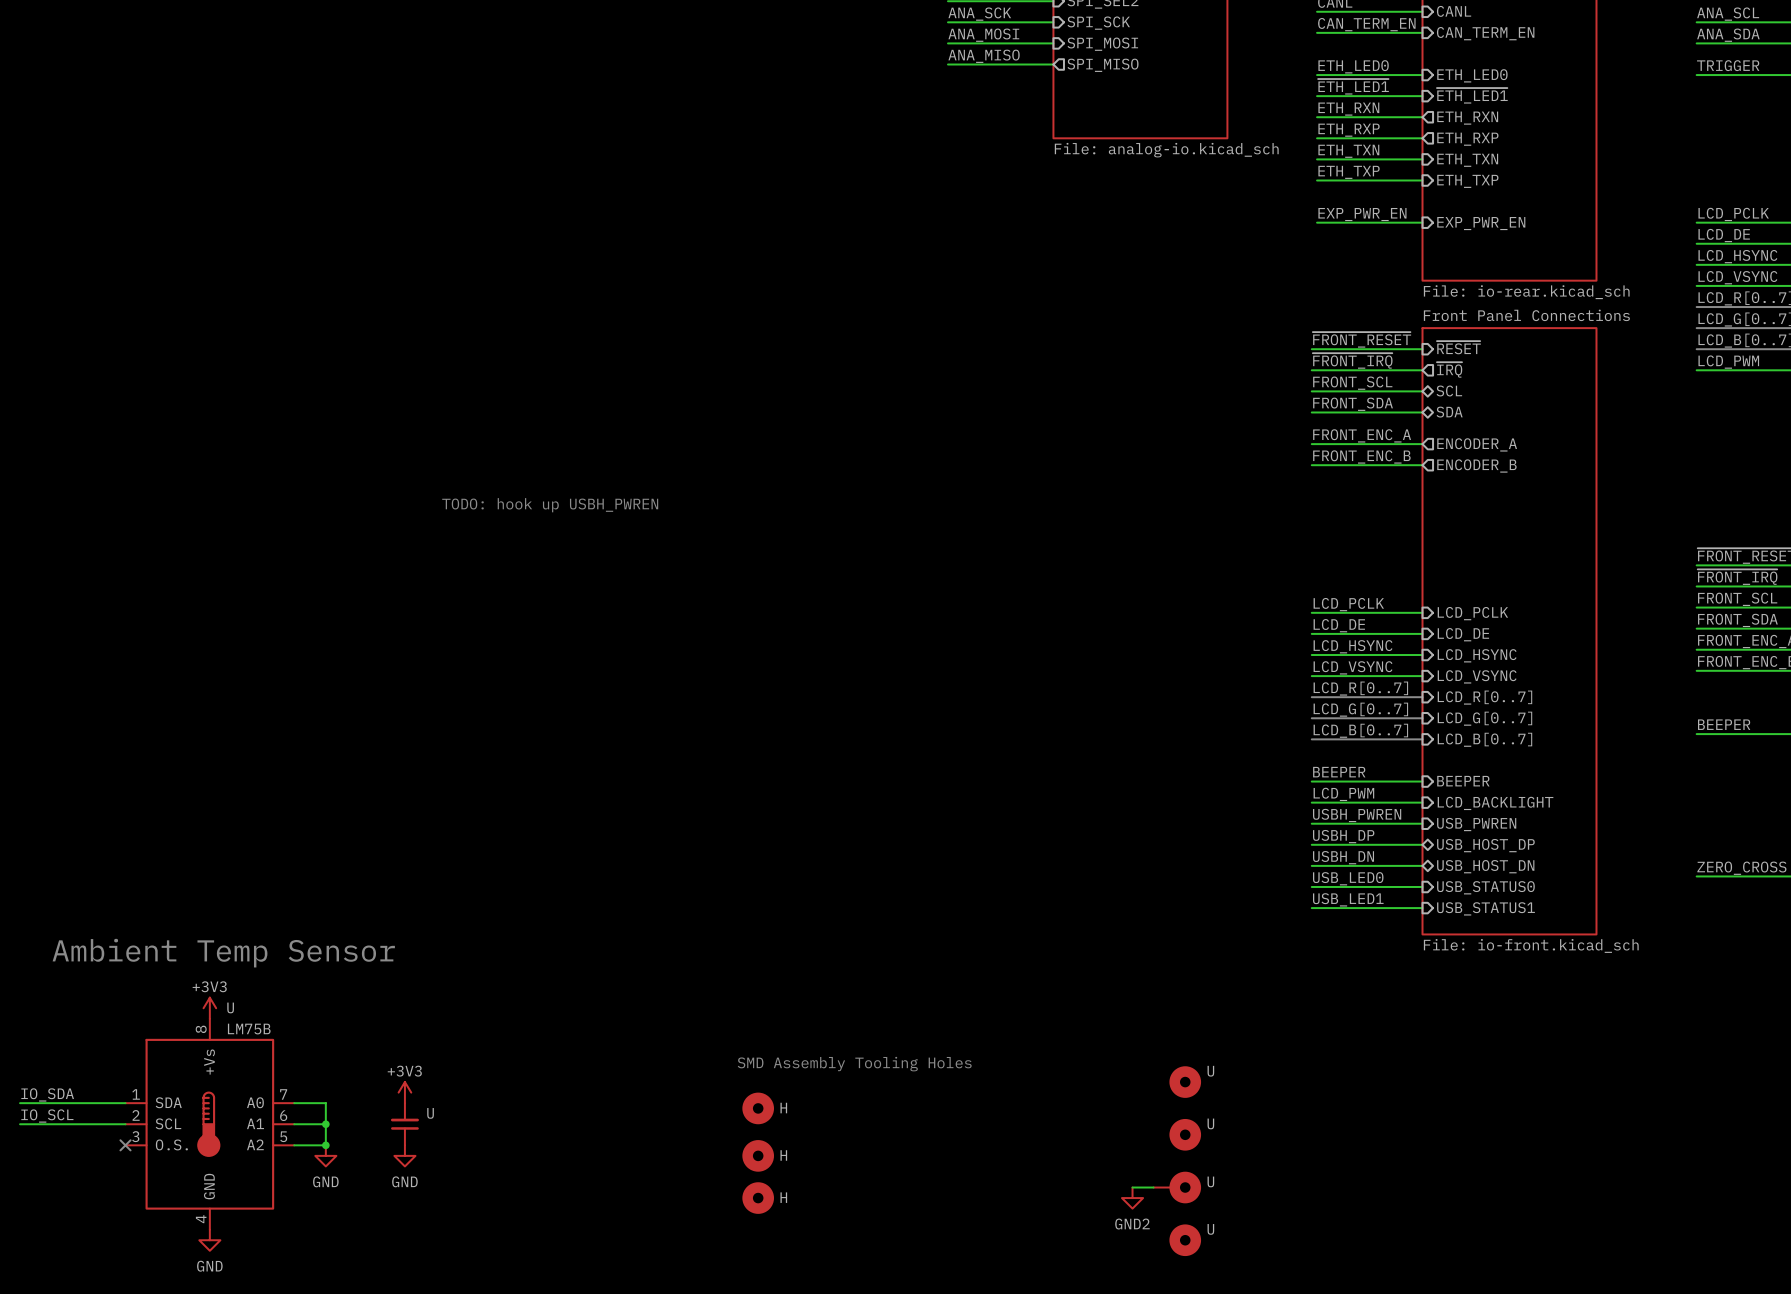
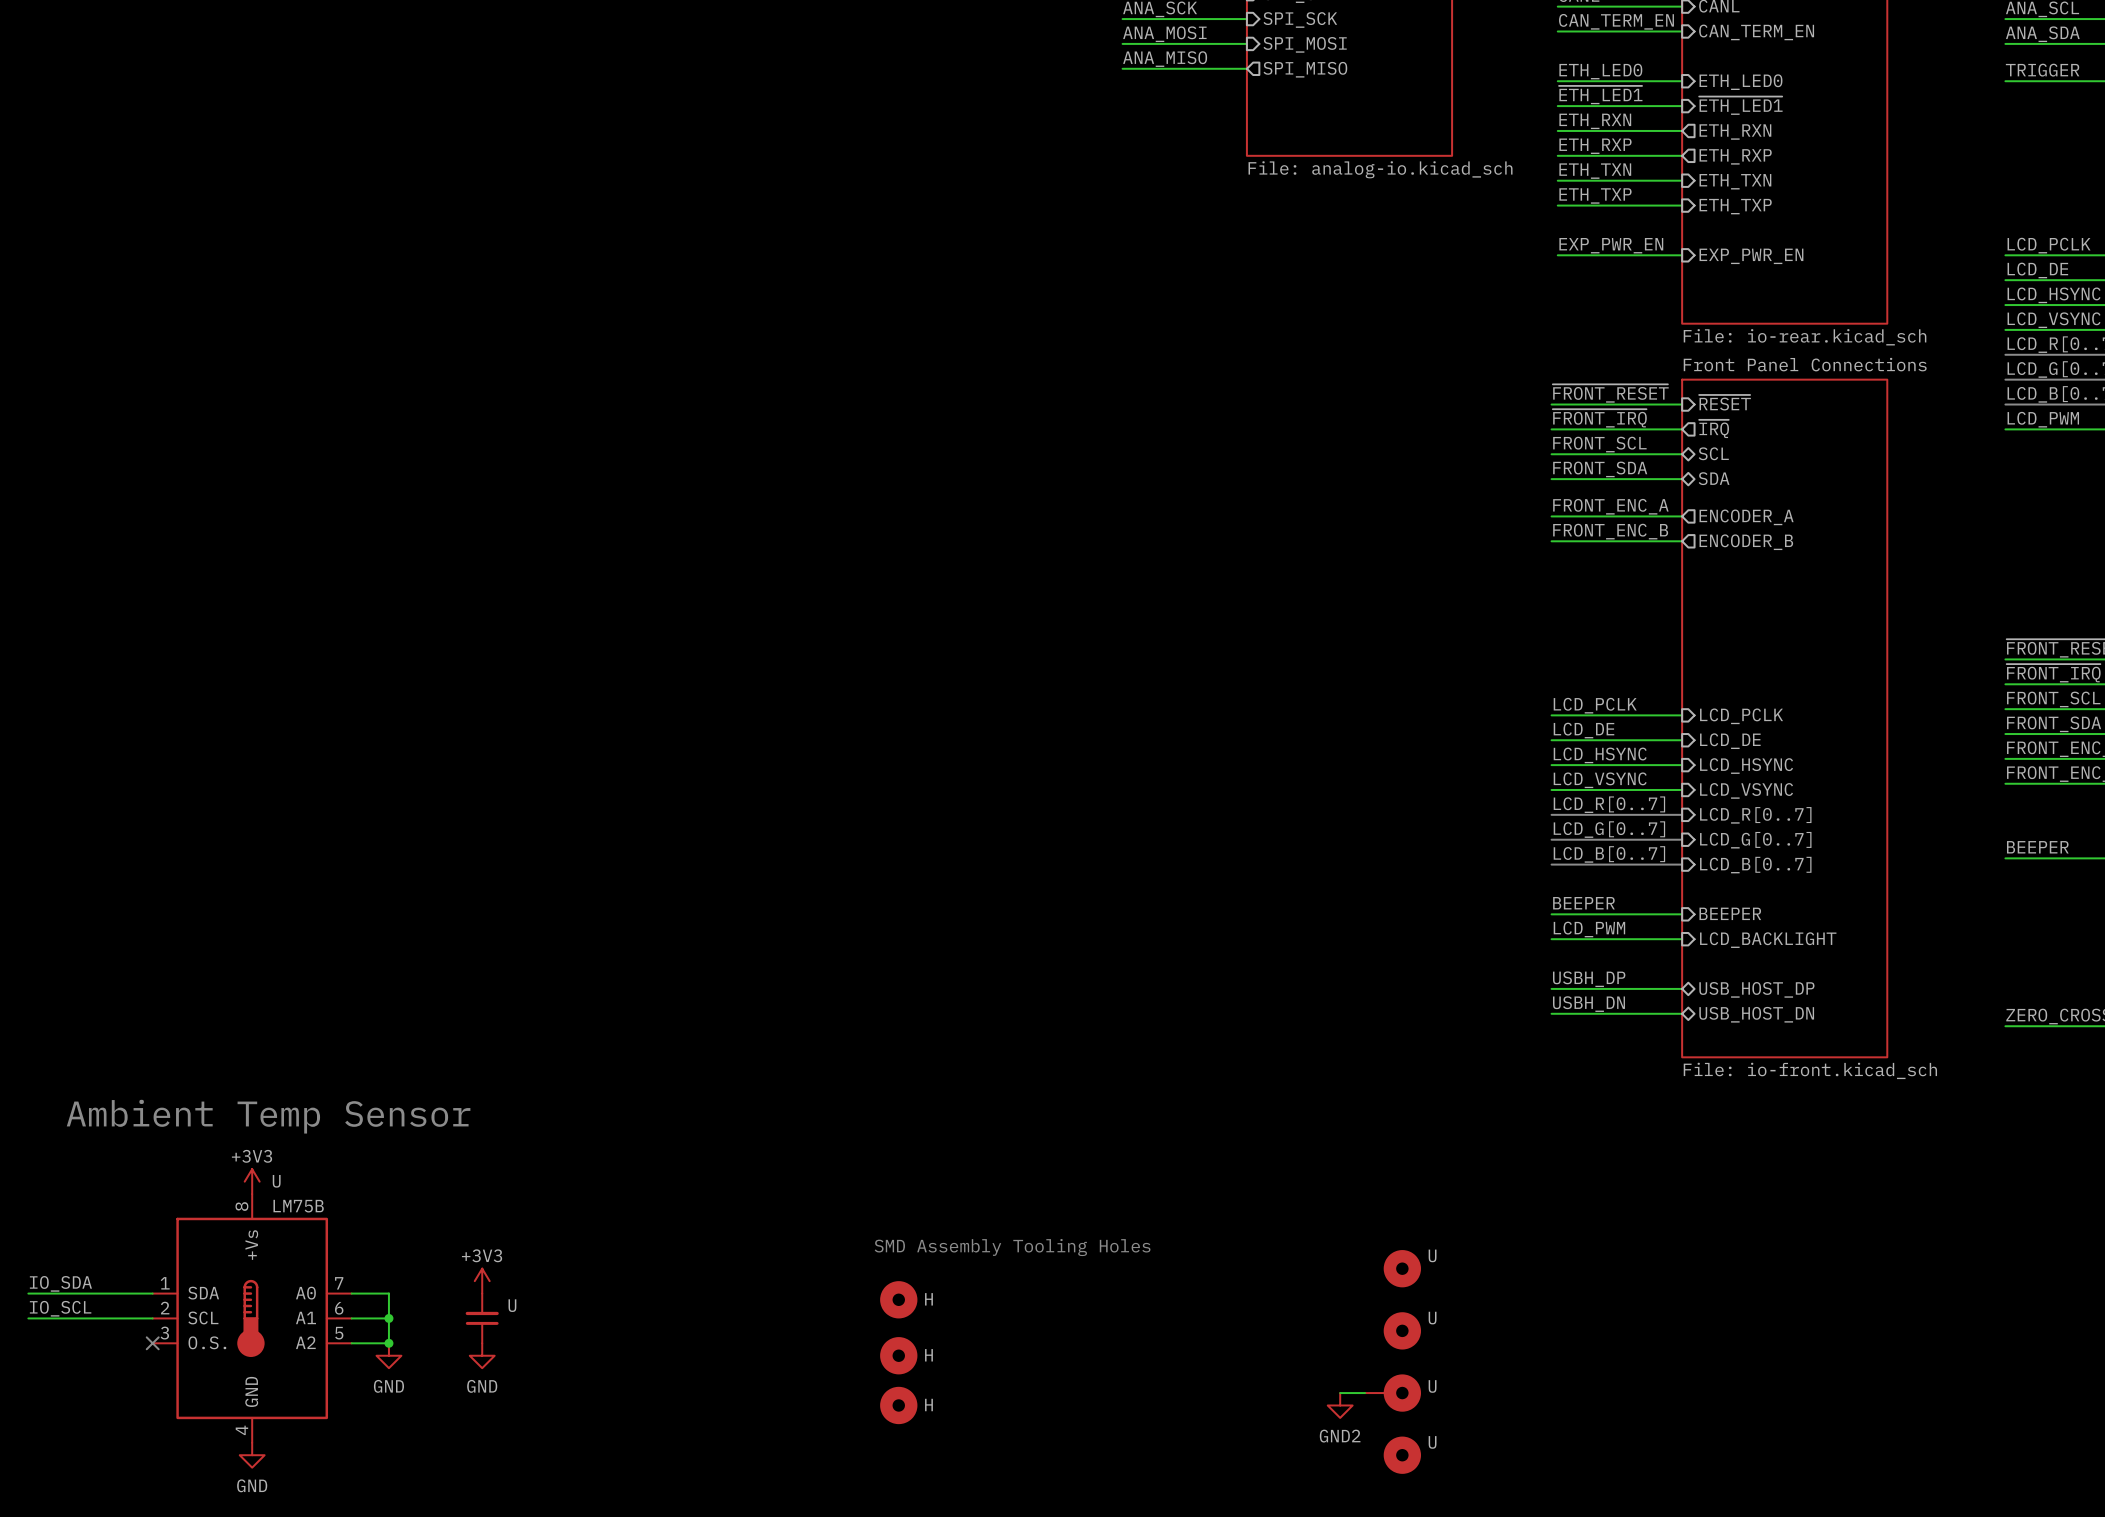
text: TODO: hook up USBH_PWREN (550, 505) -> none
sheet Front Panel Connections: none -> File: io-front.kicad_sch (1784, 718)
sheet Front Panel Connections: File: io-front.kicad_sch (1509, 631) -> none
label: USBH_PWREN (1357, 815) -> none
wire: (1311, 823) (1422, 823) -> none
sheet pin: USB_PWREN (1476, 824) -> none
label: USB_LED0 (1348, 878) -> none
wire: (1311, 886) (1422, 886) -> none
sheet pin: USB_STATUS0 (1485, 887) -> none
label: USB_LED1 (1348, 899) -> none
wire: (1311, 908) (1422, 908) -> none
sheet pin: USB_STATUS1 (1486, 908) -> none

